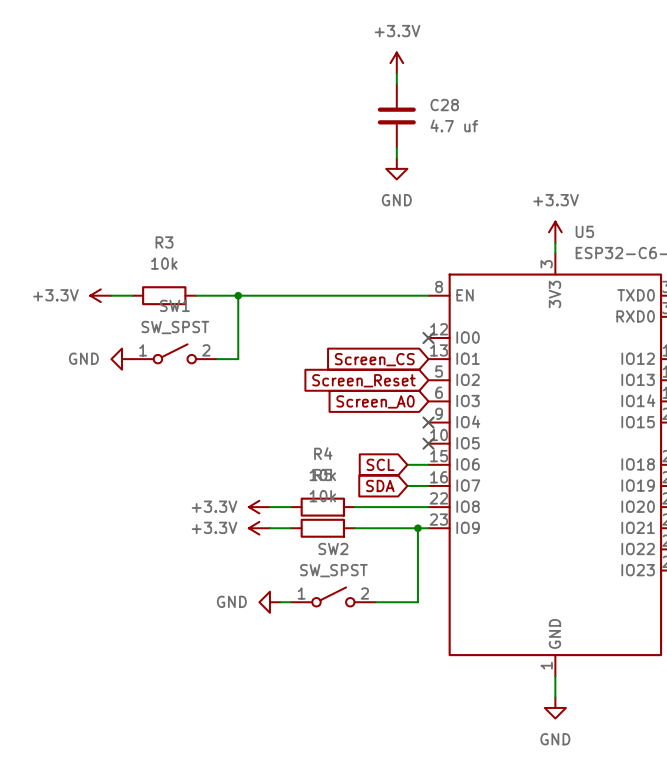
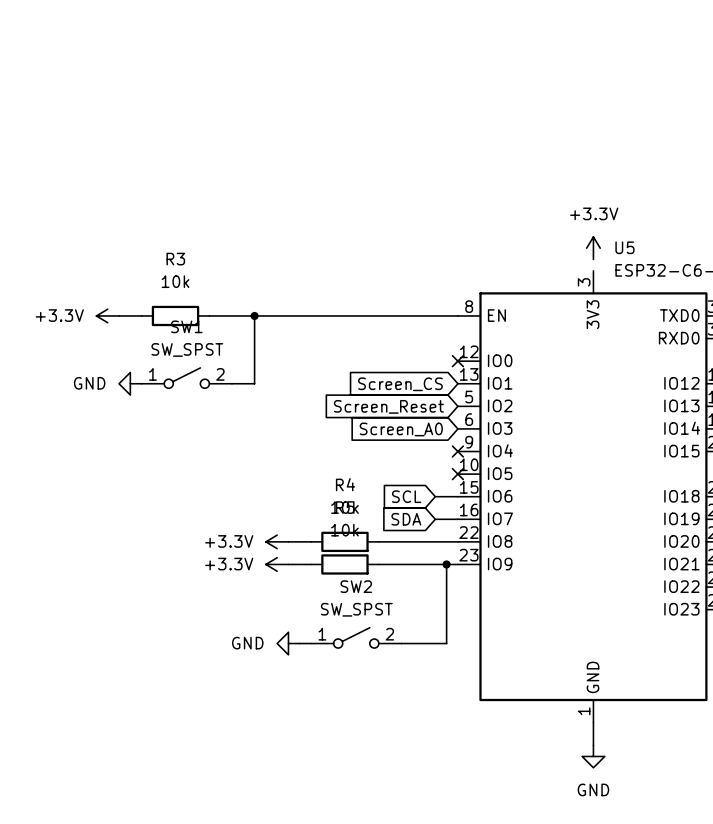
power symbol: +3.3V (396, 63) -> none
wire: (396, 73) (396, 84) -> none
C28: 4.7 uf (396, 116) -> none
wire: (396, 147) (396, 158) -> none
power symbol: GND (396, 168) -> none
wire: (555, 242) (555, 253) -> none

